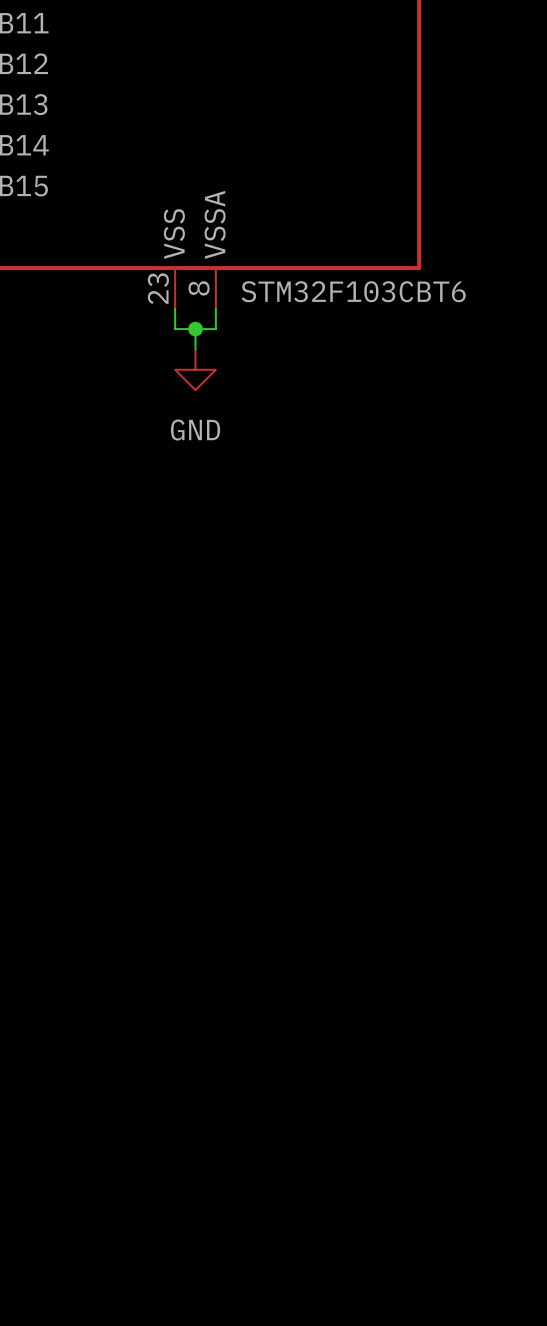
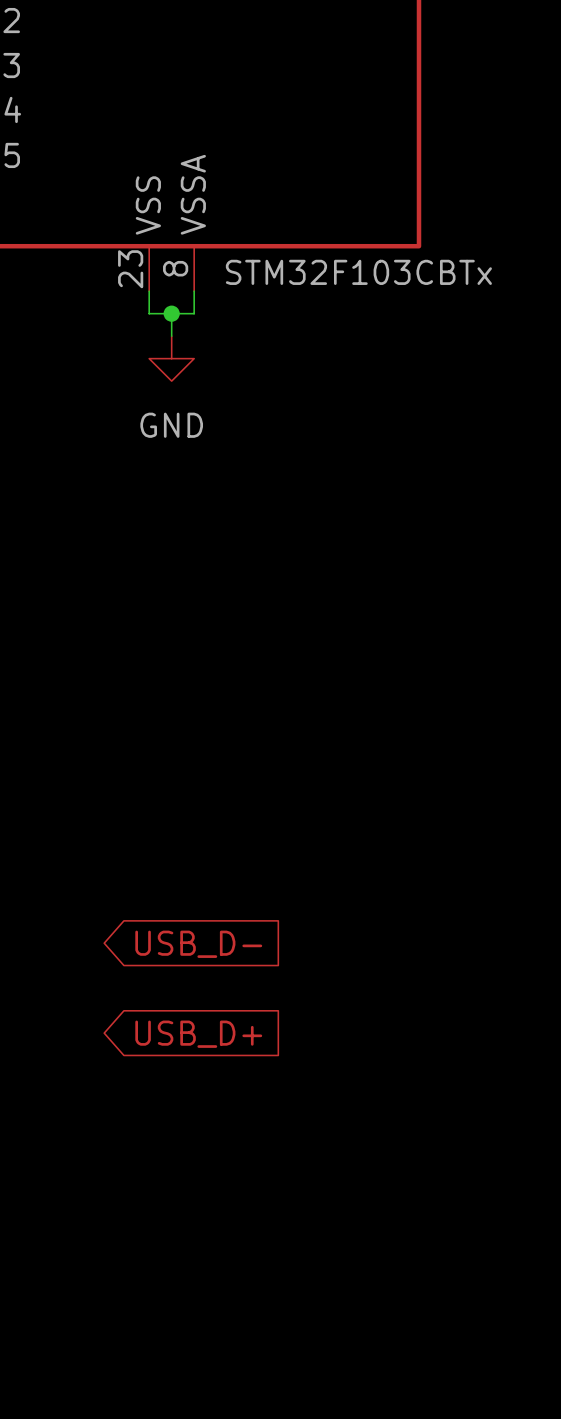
part value: STM32F103CBT6 (353, 291) -> STM32F103CBTx (358, 272)
global label: none -> USB_D- (198, 944)
global label: none -> USB_D+ (198, 1034)

